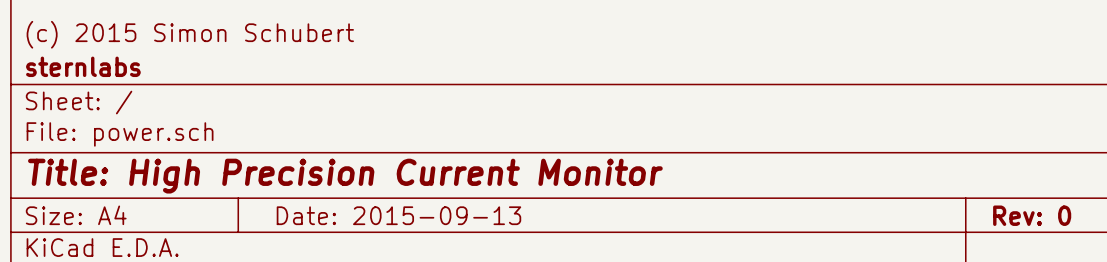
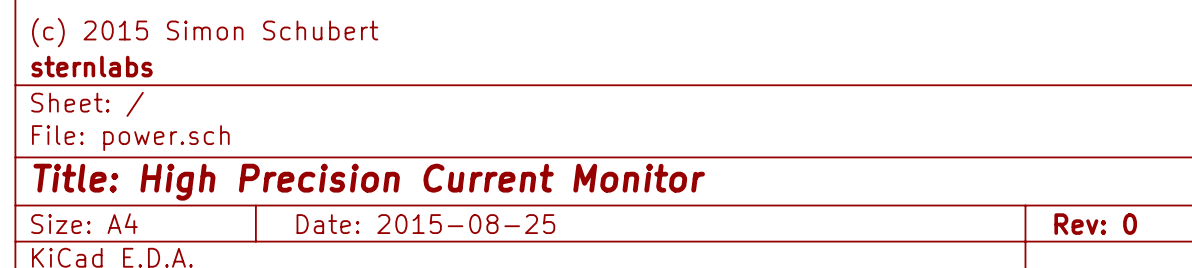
title block: Date: 2015-09-13 (398, 215) -> Date: 2015-08-25 (425, 224)

